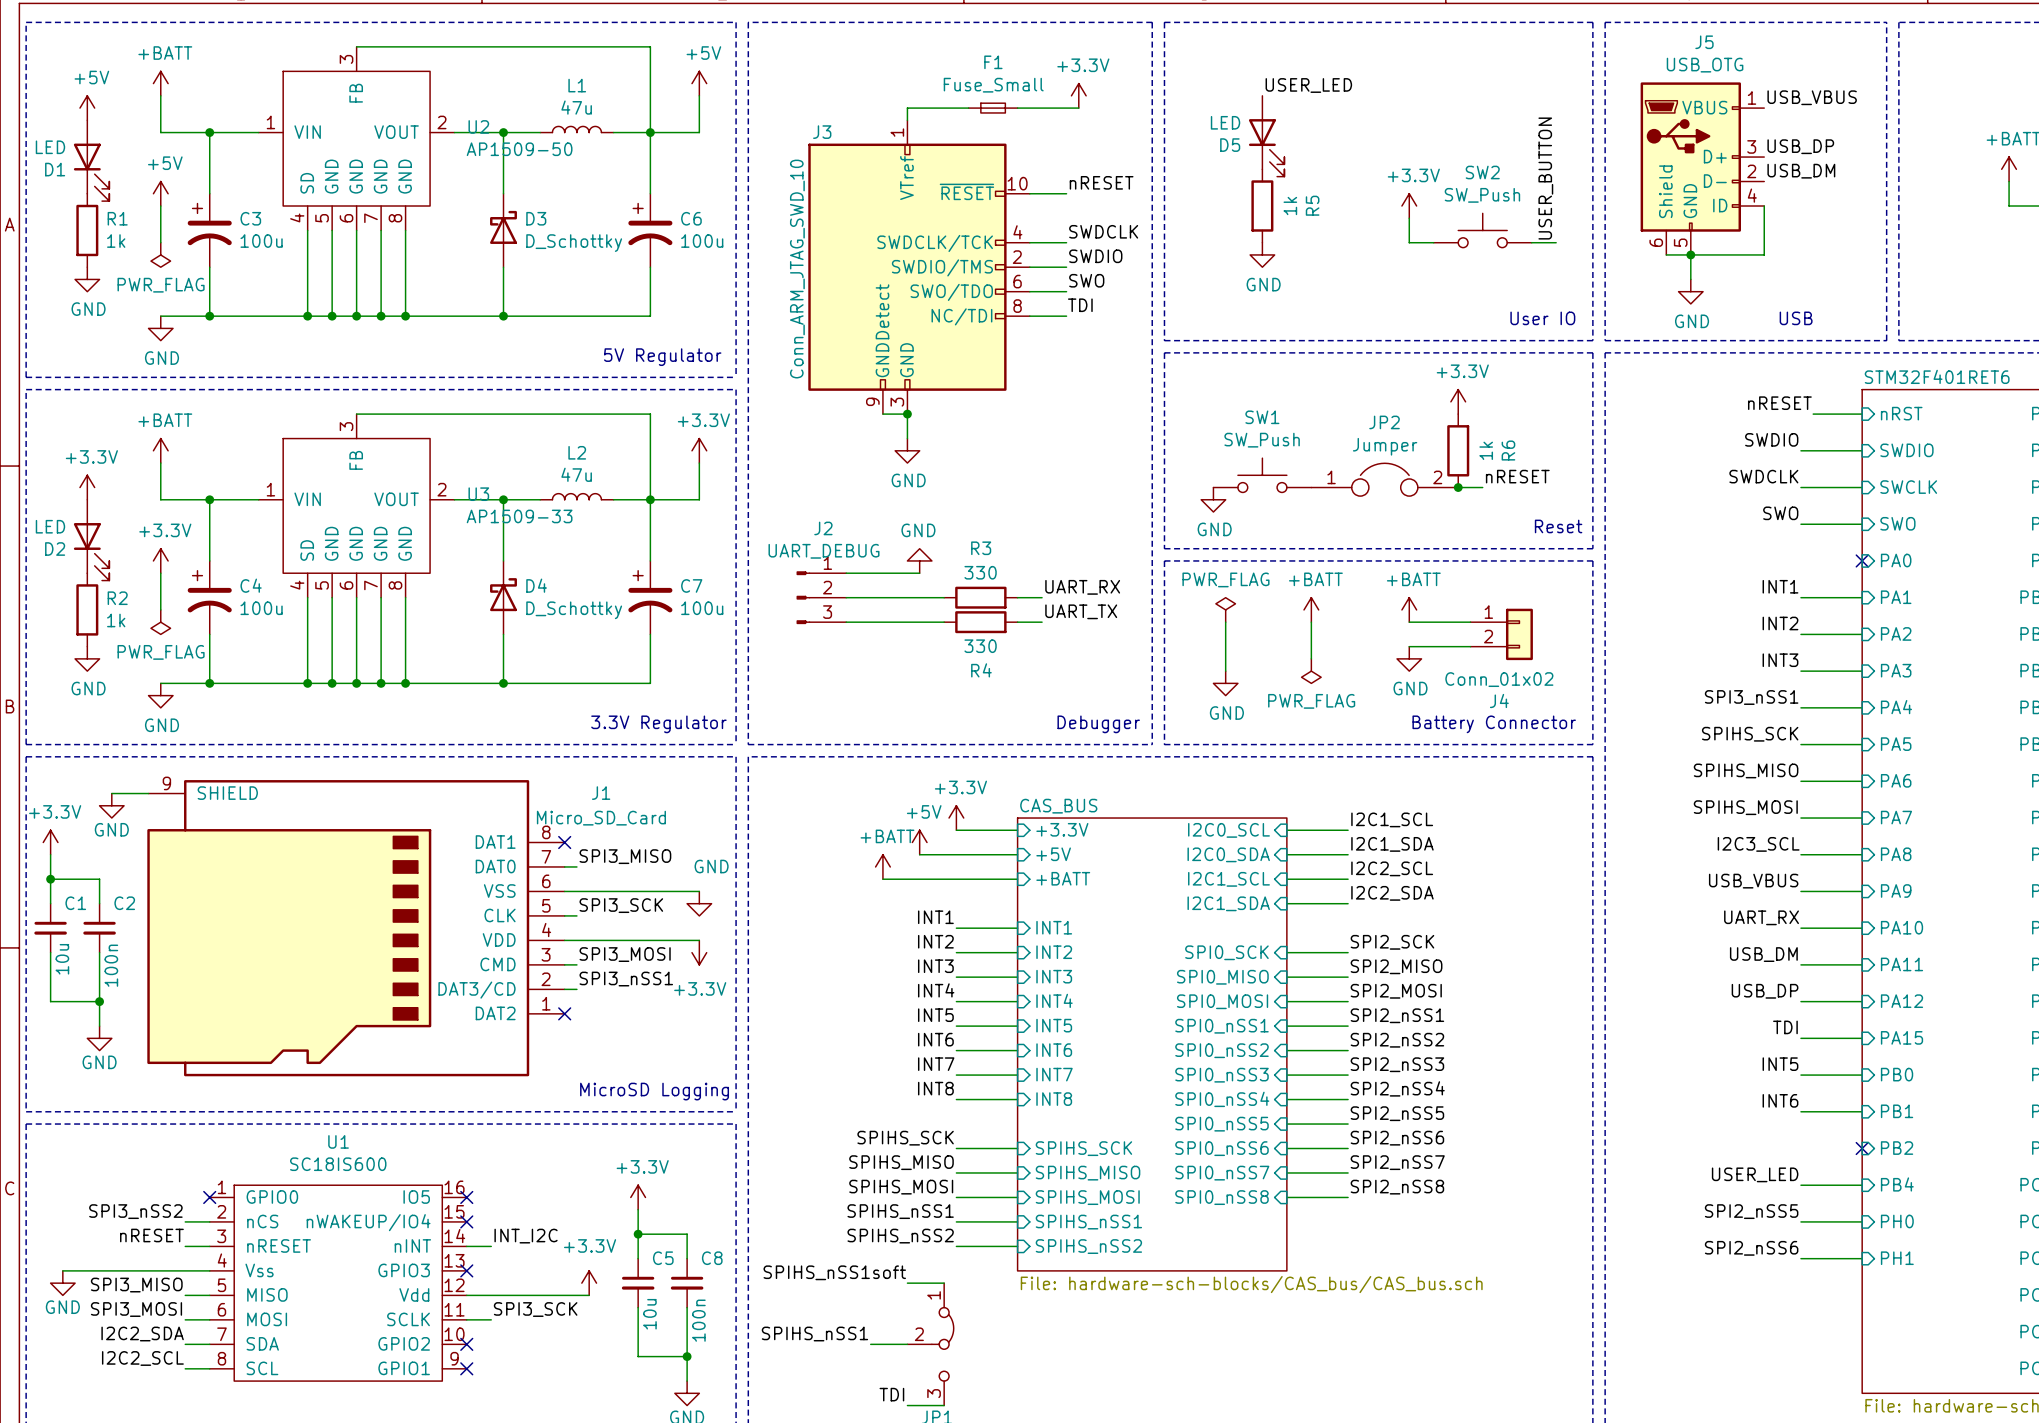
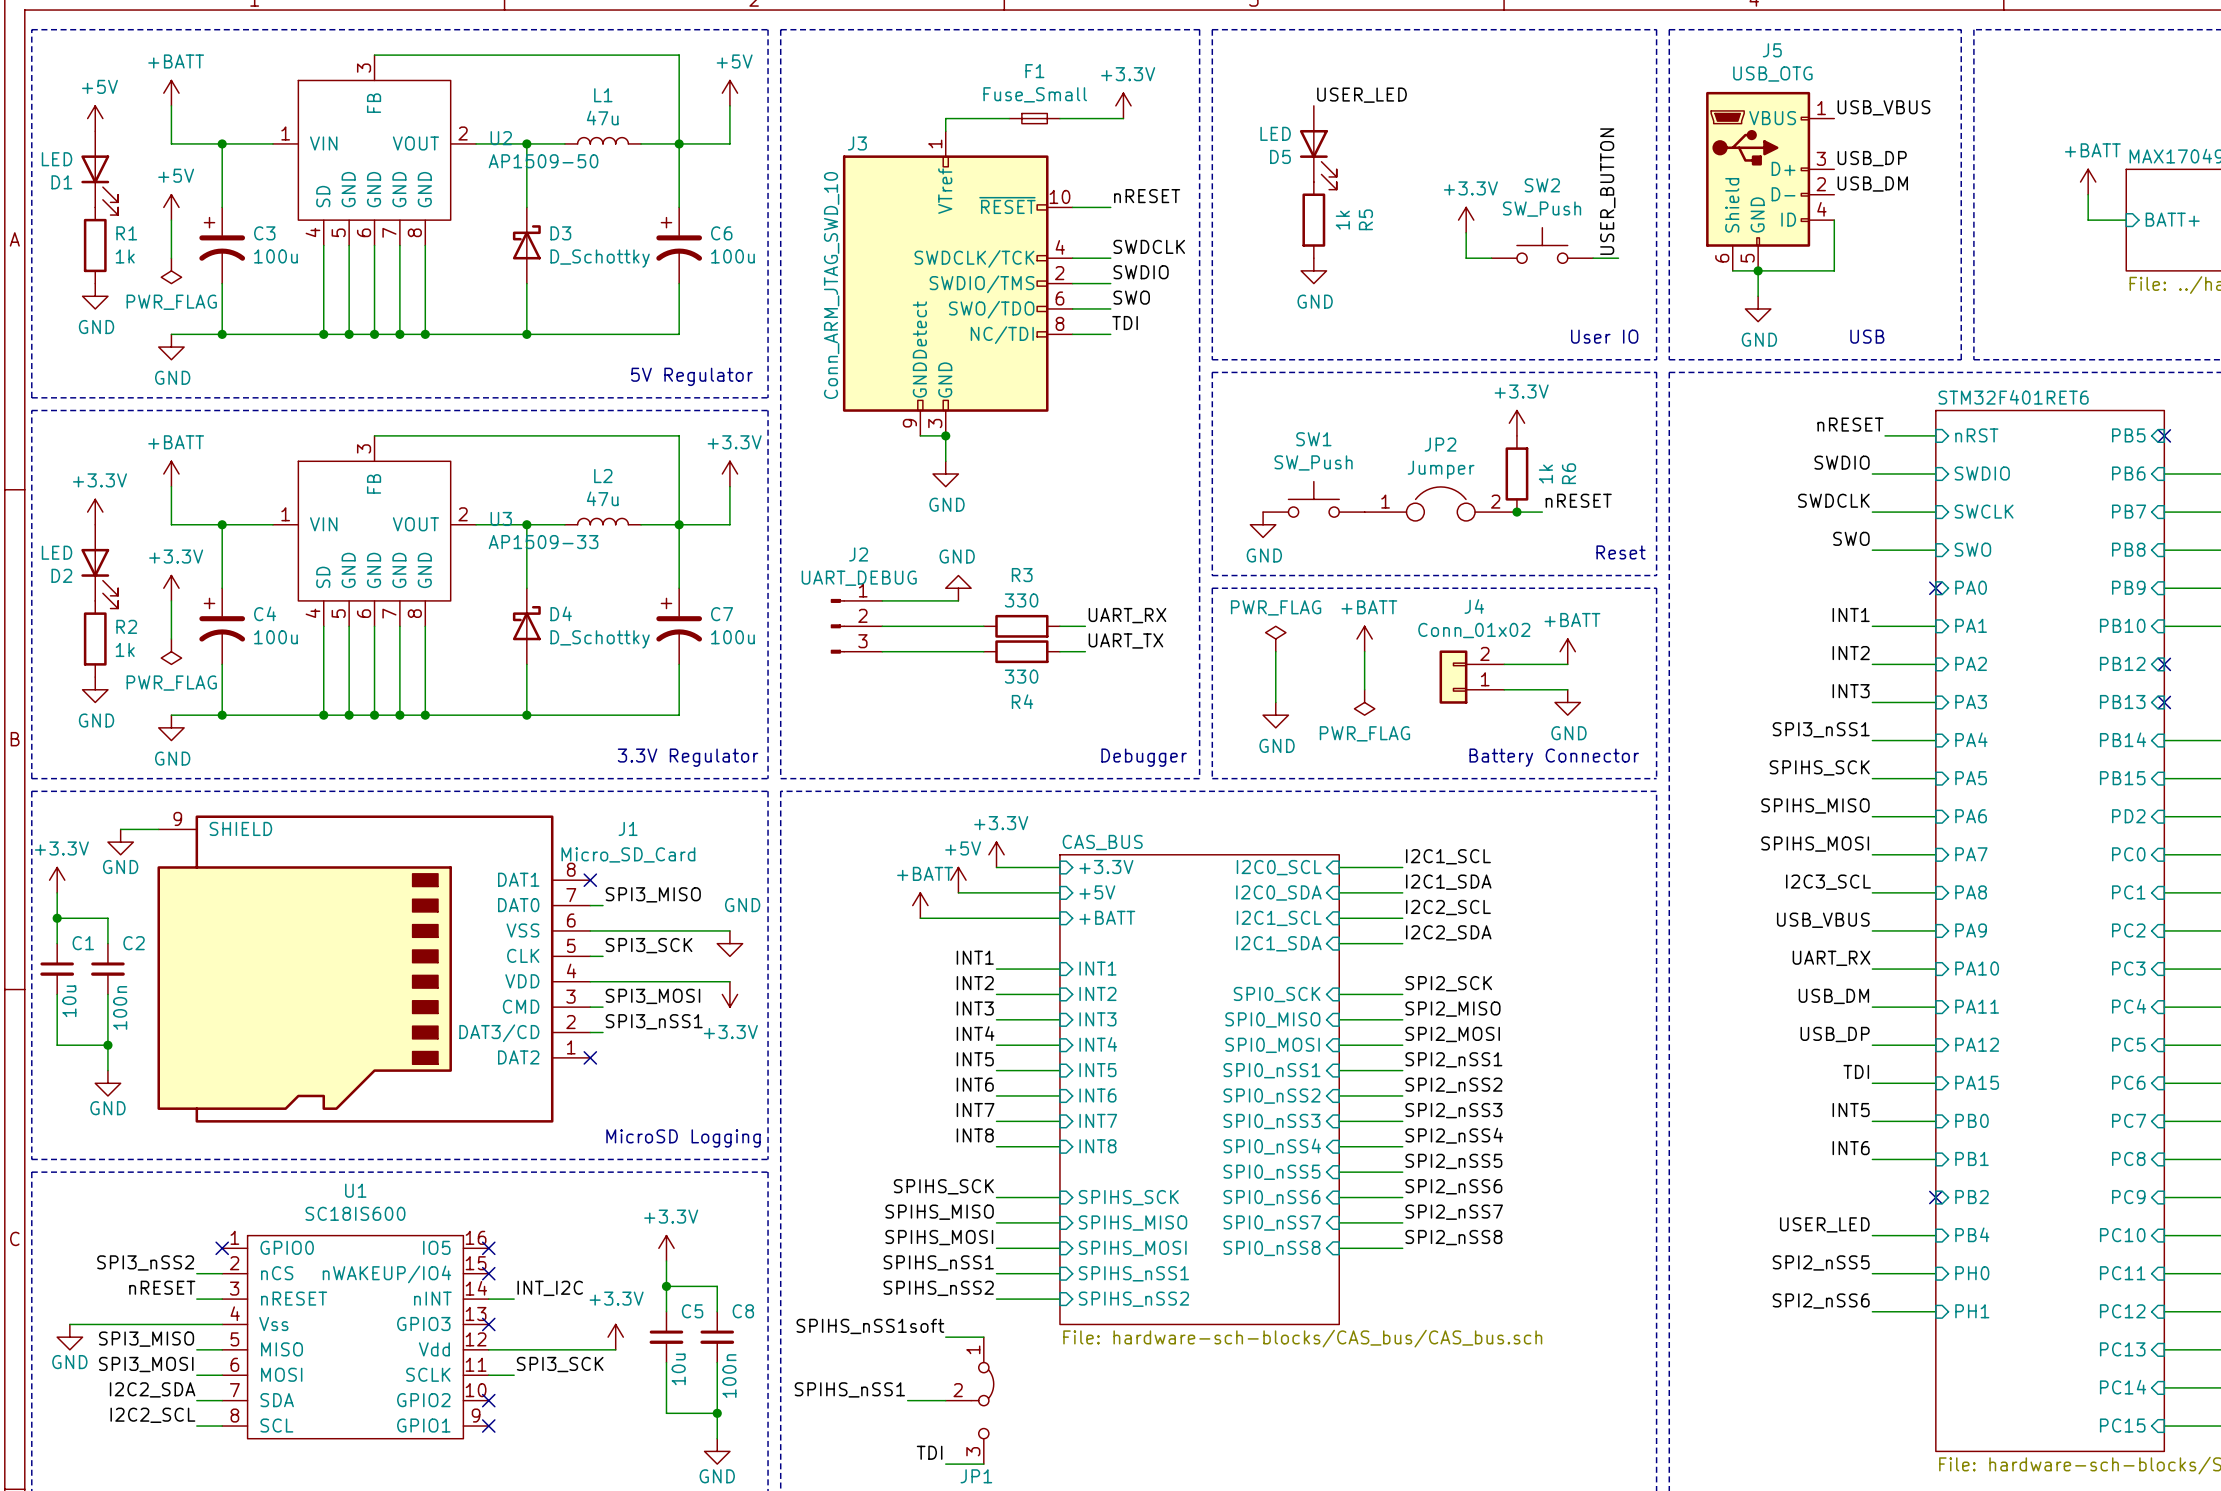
power symbol position: +BATT (1409, 609) -> +BATT (1567, 651)
wire: (1409, 622) (1470, 622) -> (1504, 664) (1567, 664)
J4 position: (1501, 634) -> (1471, 677)
J4 rotation: 0° (1519, 634) -> 180° (1453, 677)
wire: (1409, 646) (1470, 646) -> (1504, 689) (1567, 689)
power symbol position: GND (1409, 658) -> GND (1567, 702)

